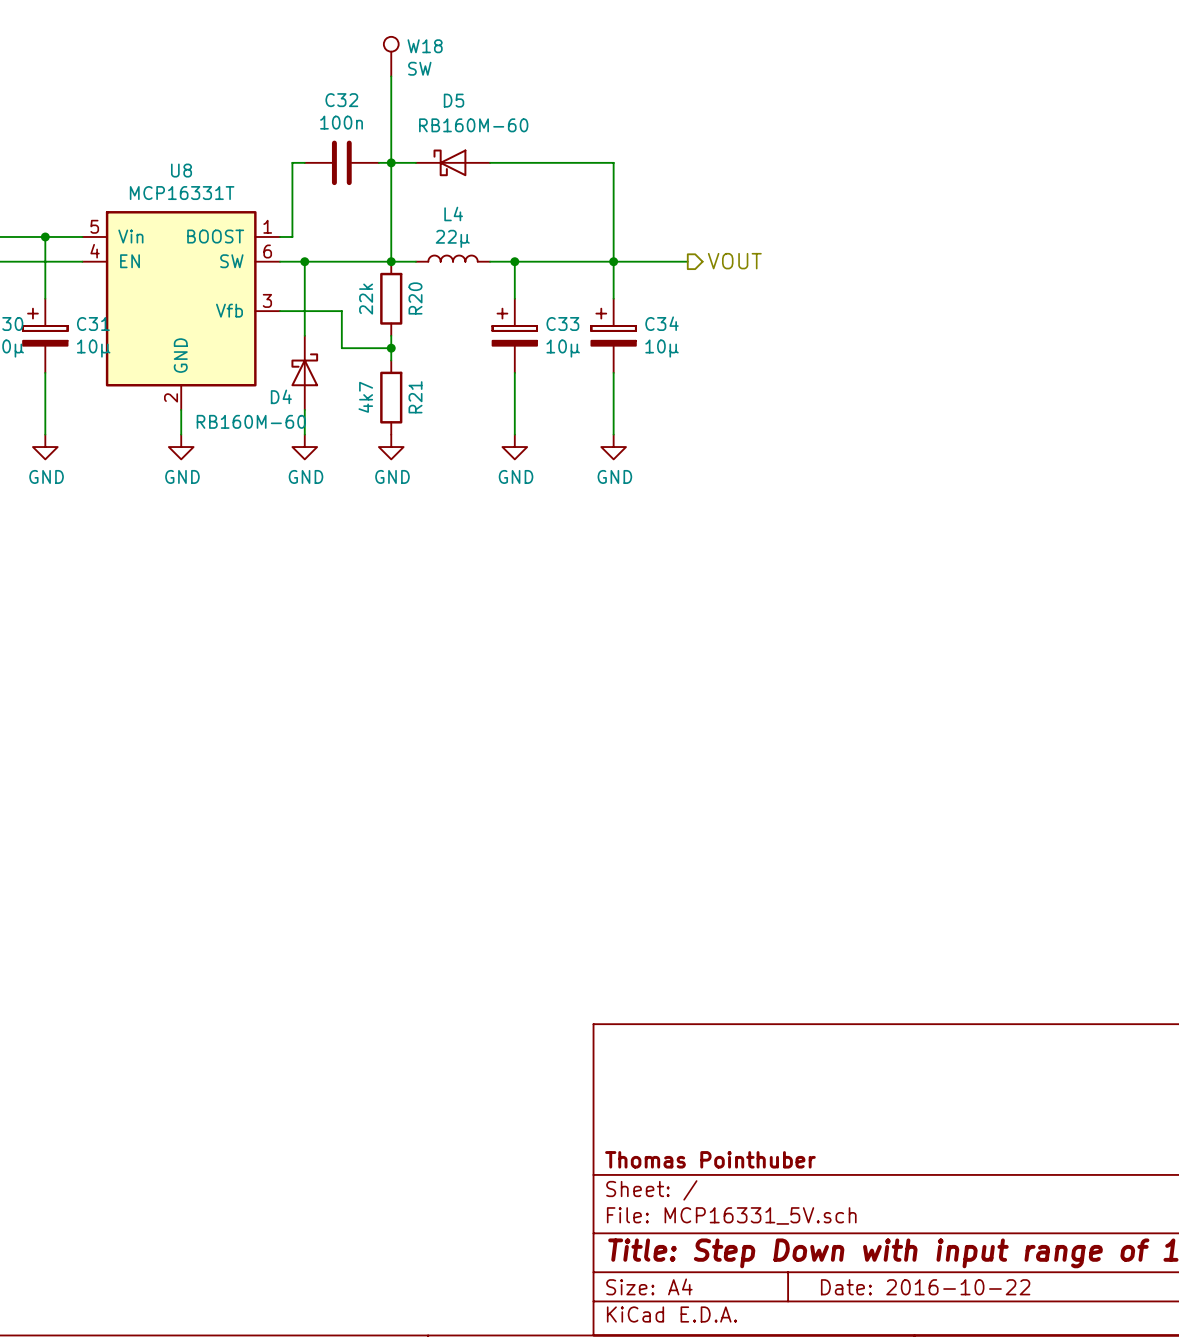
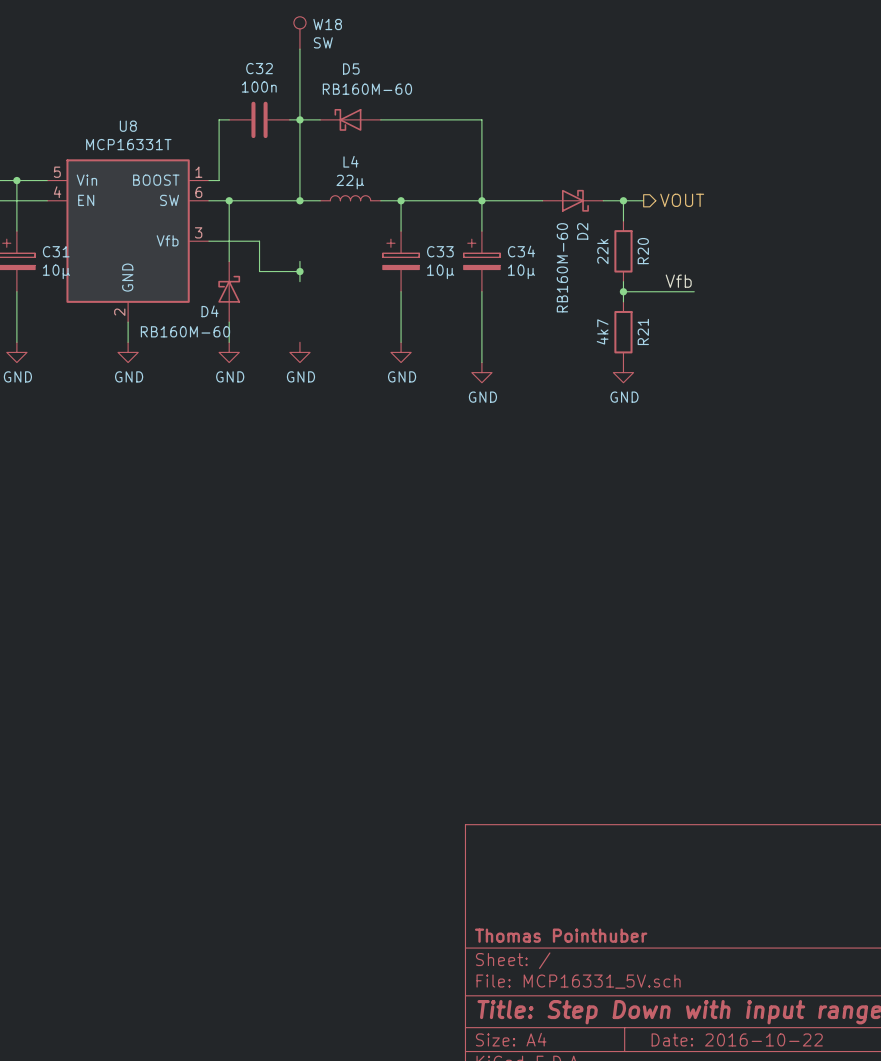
D2: none -> RB160M-60 (572, 200)
hierarchical label position: VOUT (734, 261) -> VOUT (682, 200)
wire: none -> (603, 200) (643, 200)
wire: none -> (623, 200) (623, 220)
junction: none -> (623, 200)
R20 position: (391, 298) -> (623, 251)
label: none -> Vfb (678, 281)
wire: none -> (623, 281) (623, 301)
wire: none -> (623, 291) (694, 291)
junction: none -> (623, 291)
R21 position: (391, 397) -> (623, 332)
power symbol position: GND (613, 447) -> GND (481, 372)
power symbol: none -> GND (623, 372)

